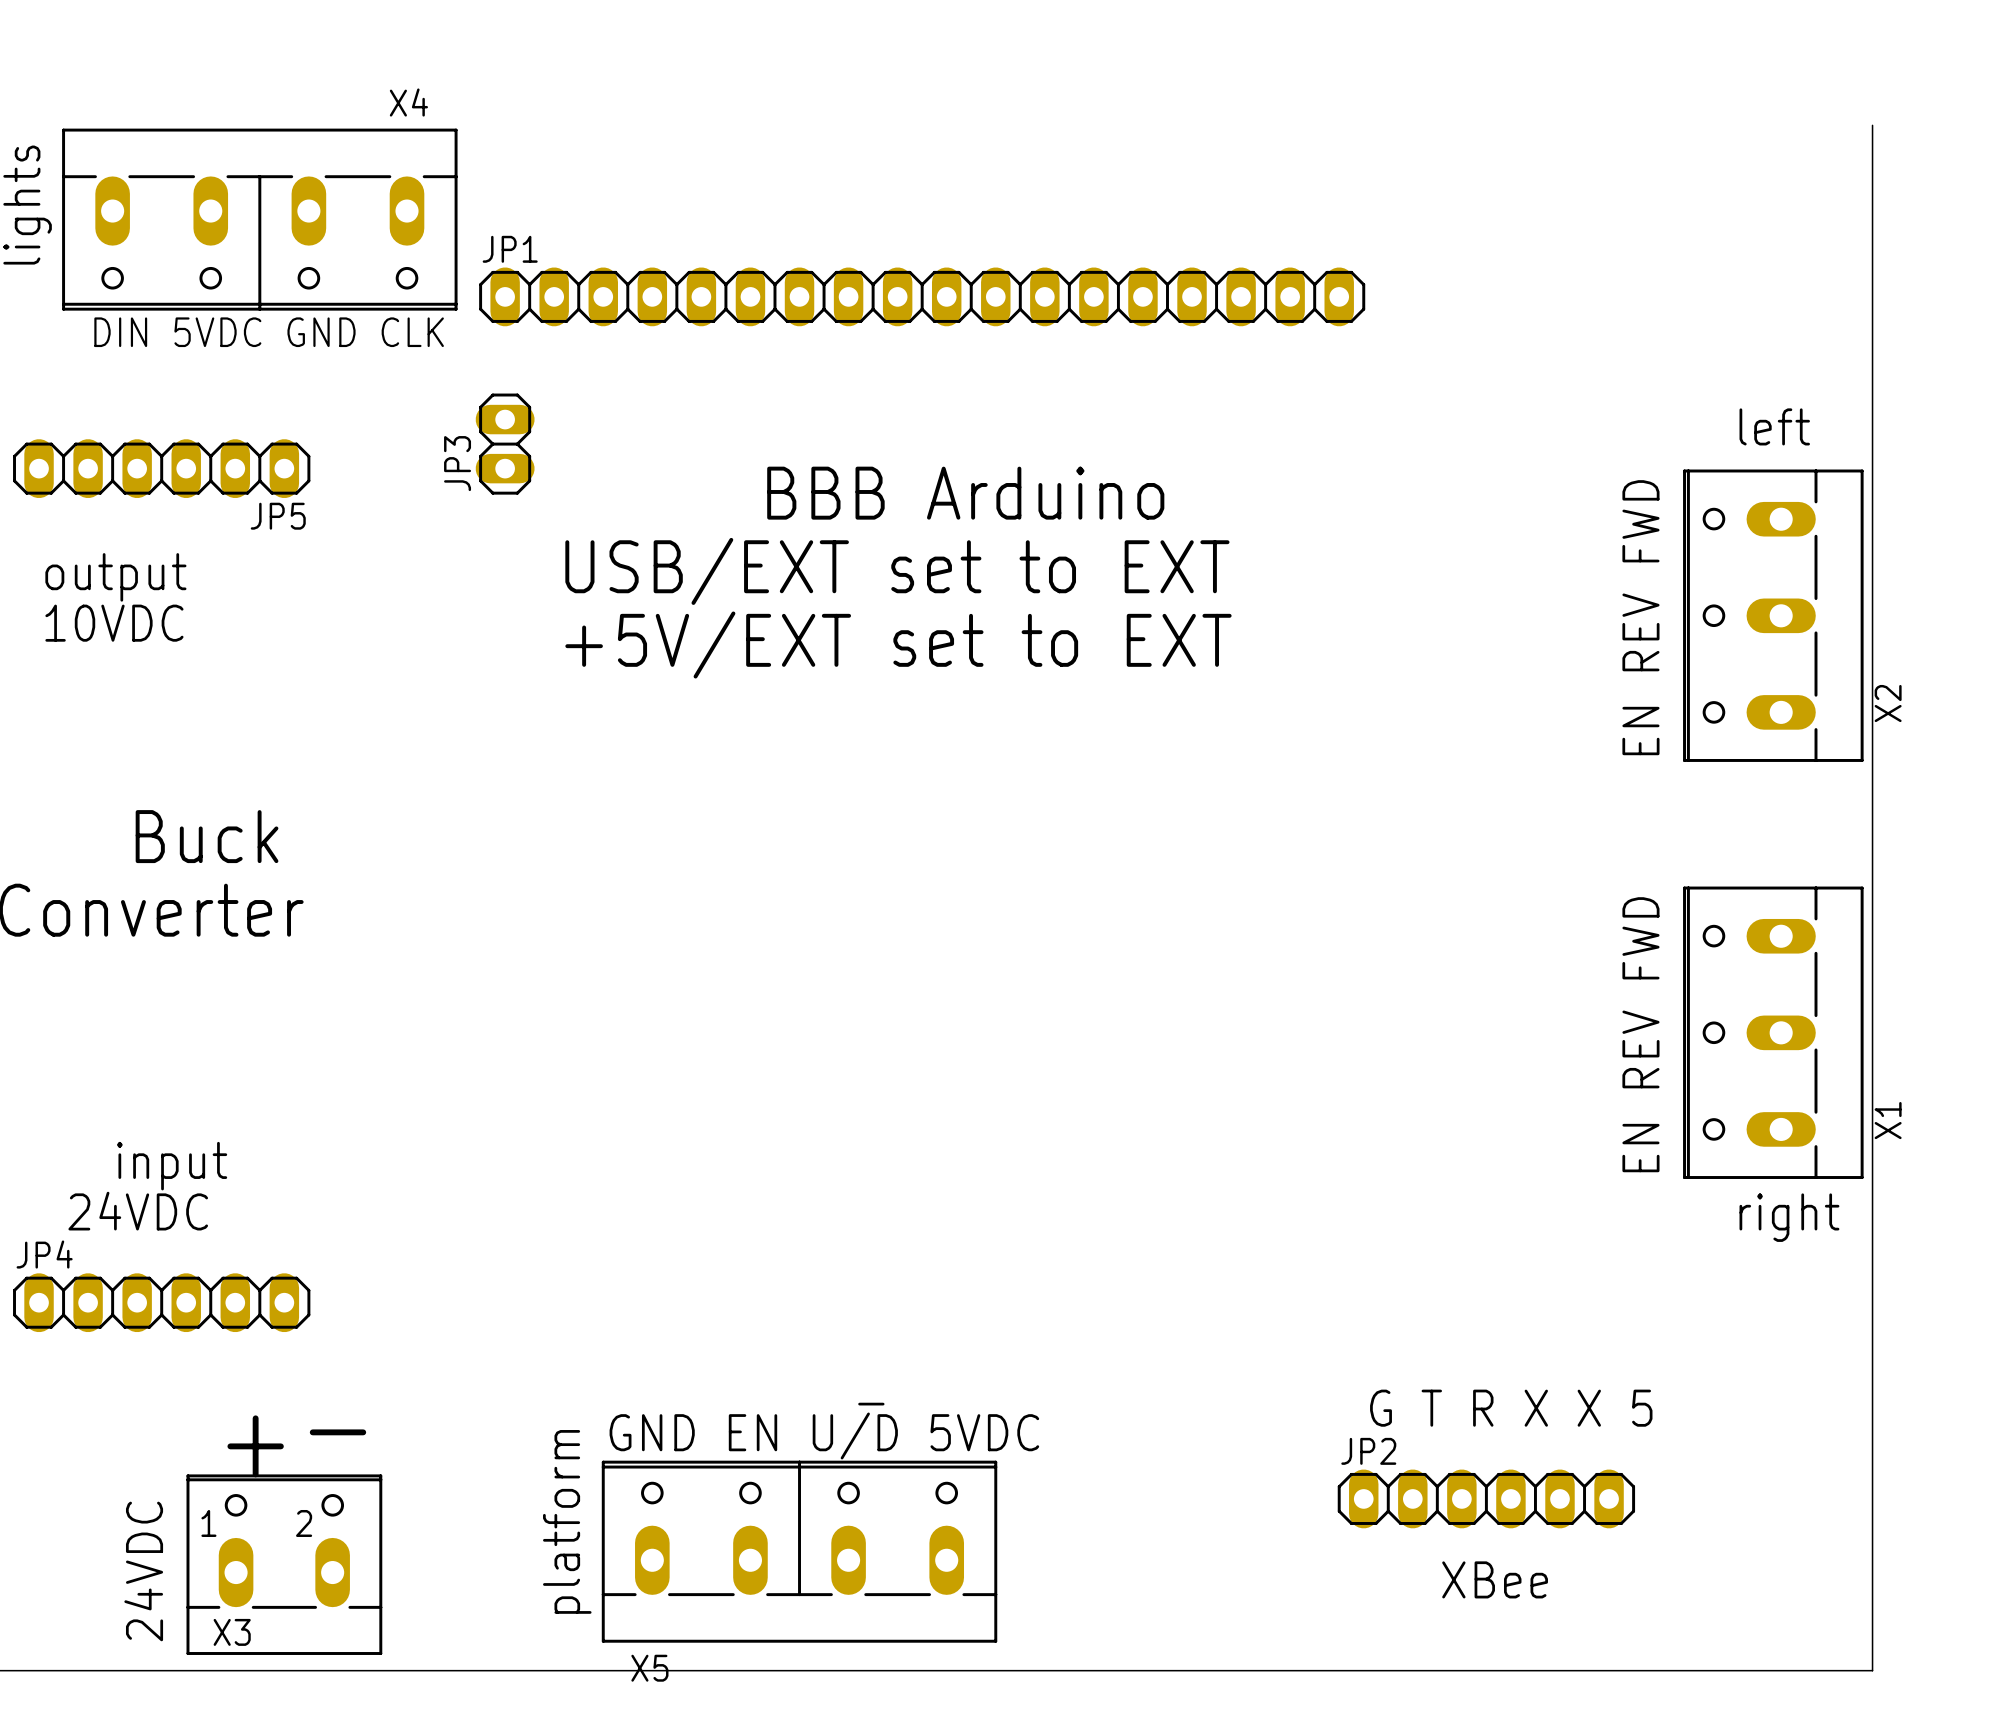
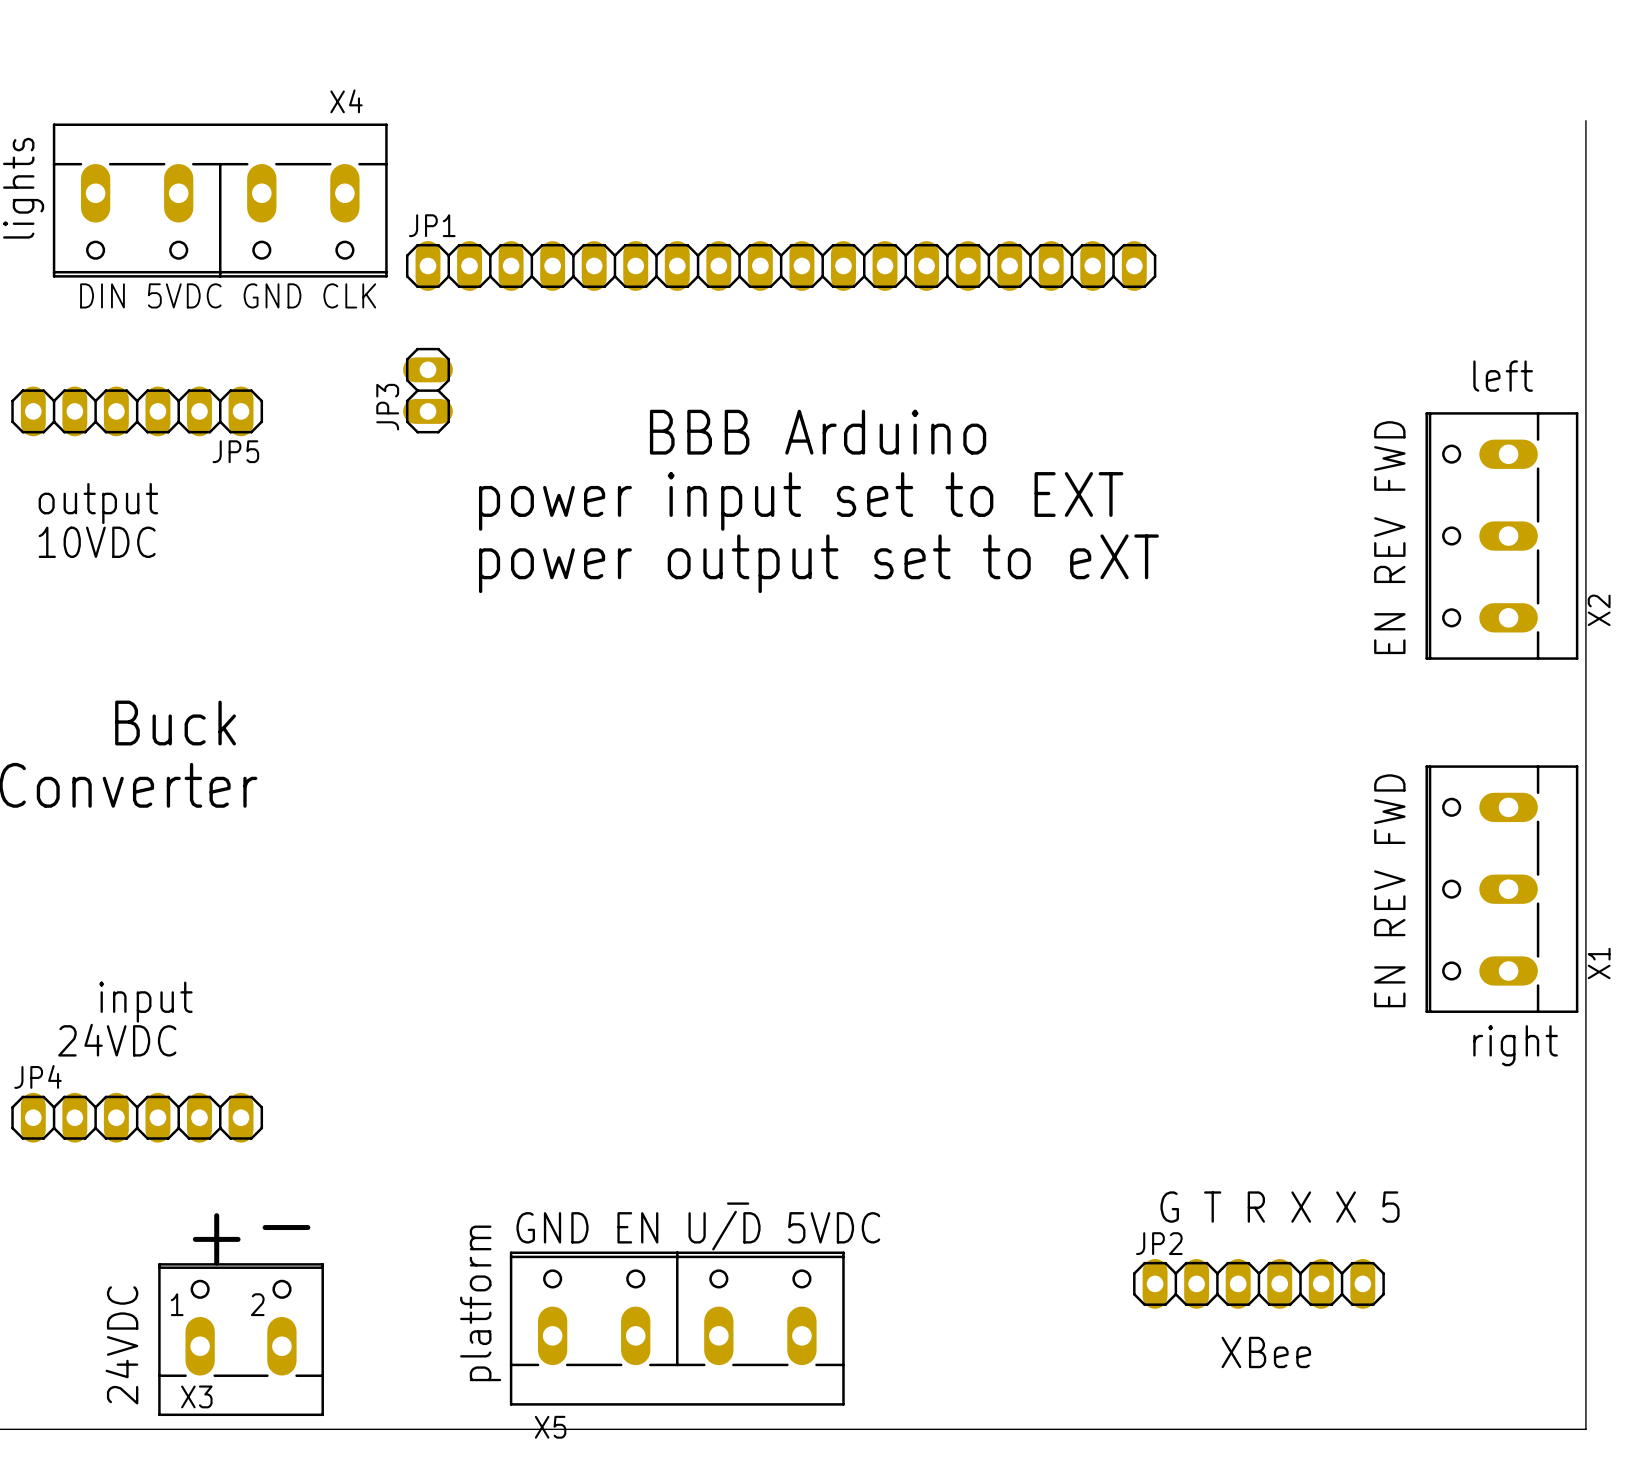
text: USB/EXT set to EXT (897, 571) -> power input set to EXT (801, 501)
text: +5V/EXT set to EXT (898, 645) -> power output set to eXT (818, 563)

